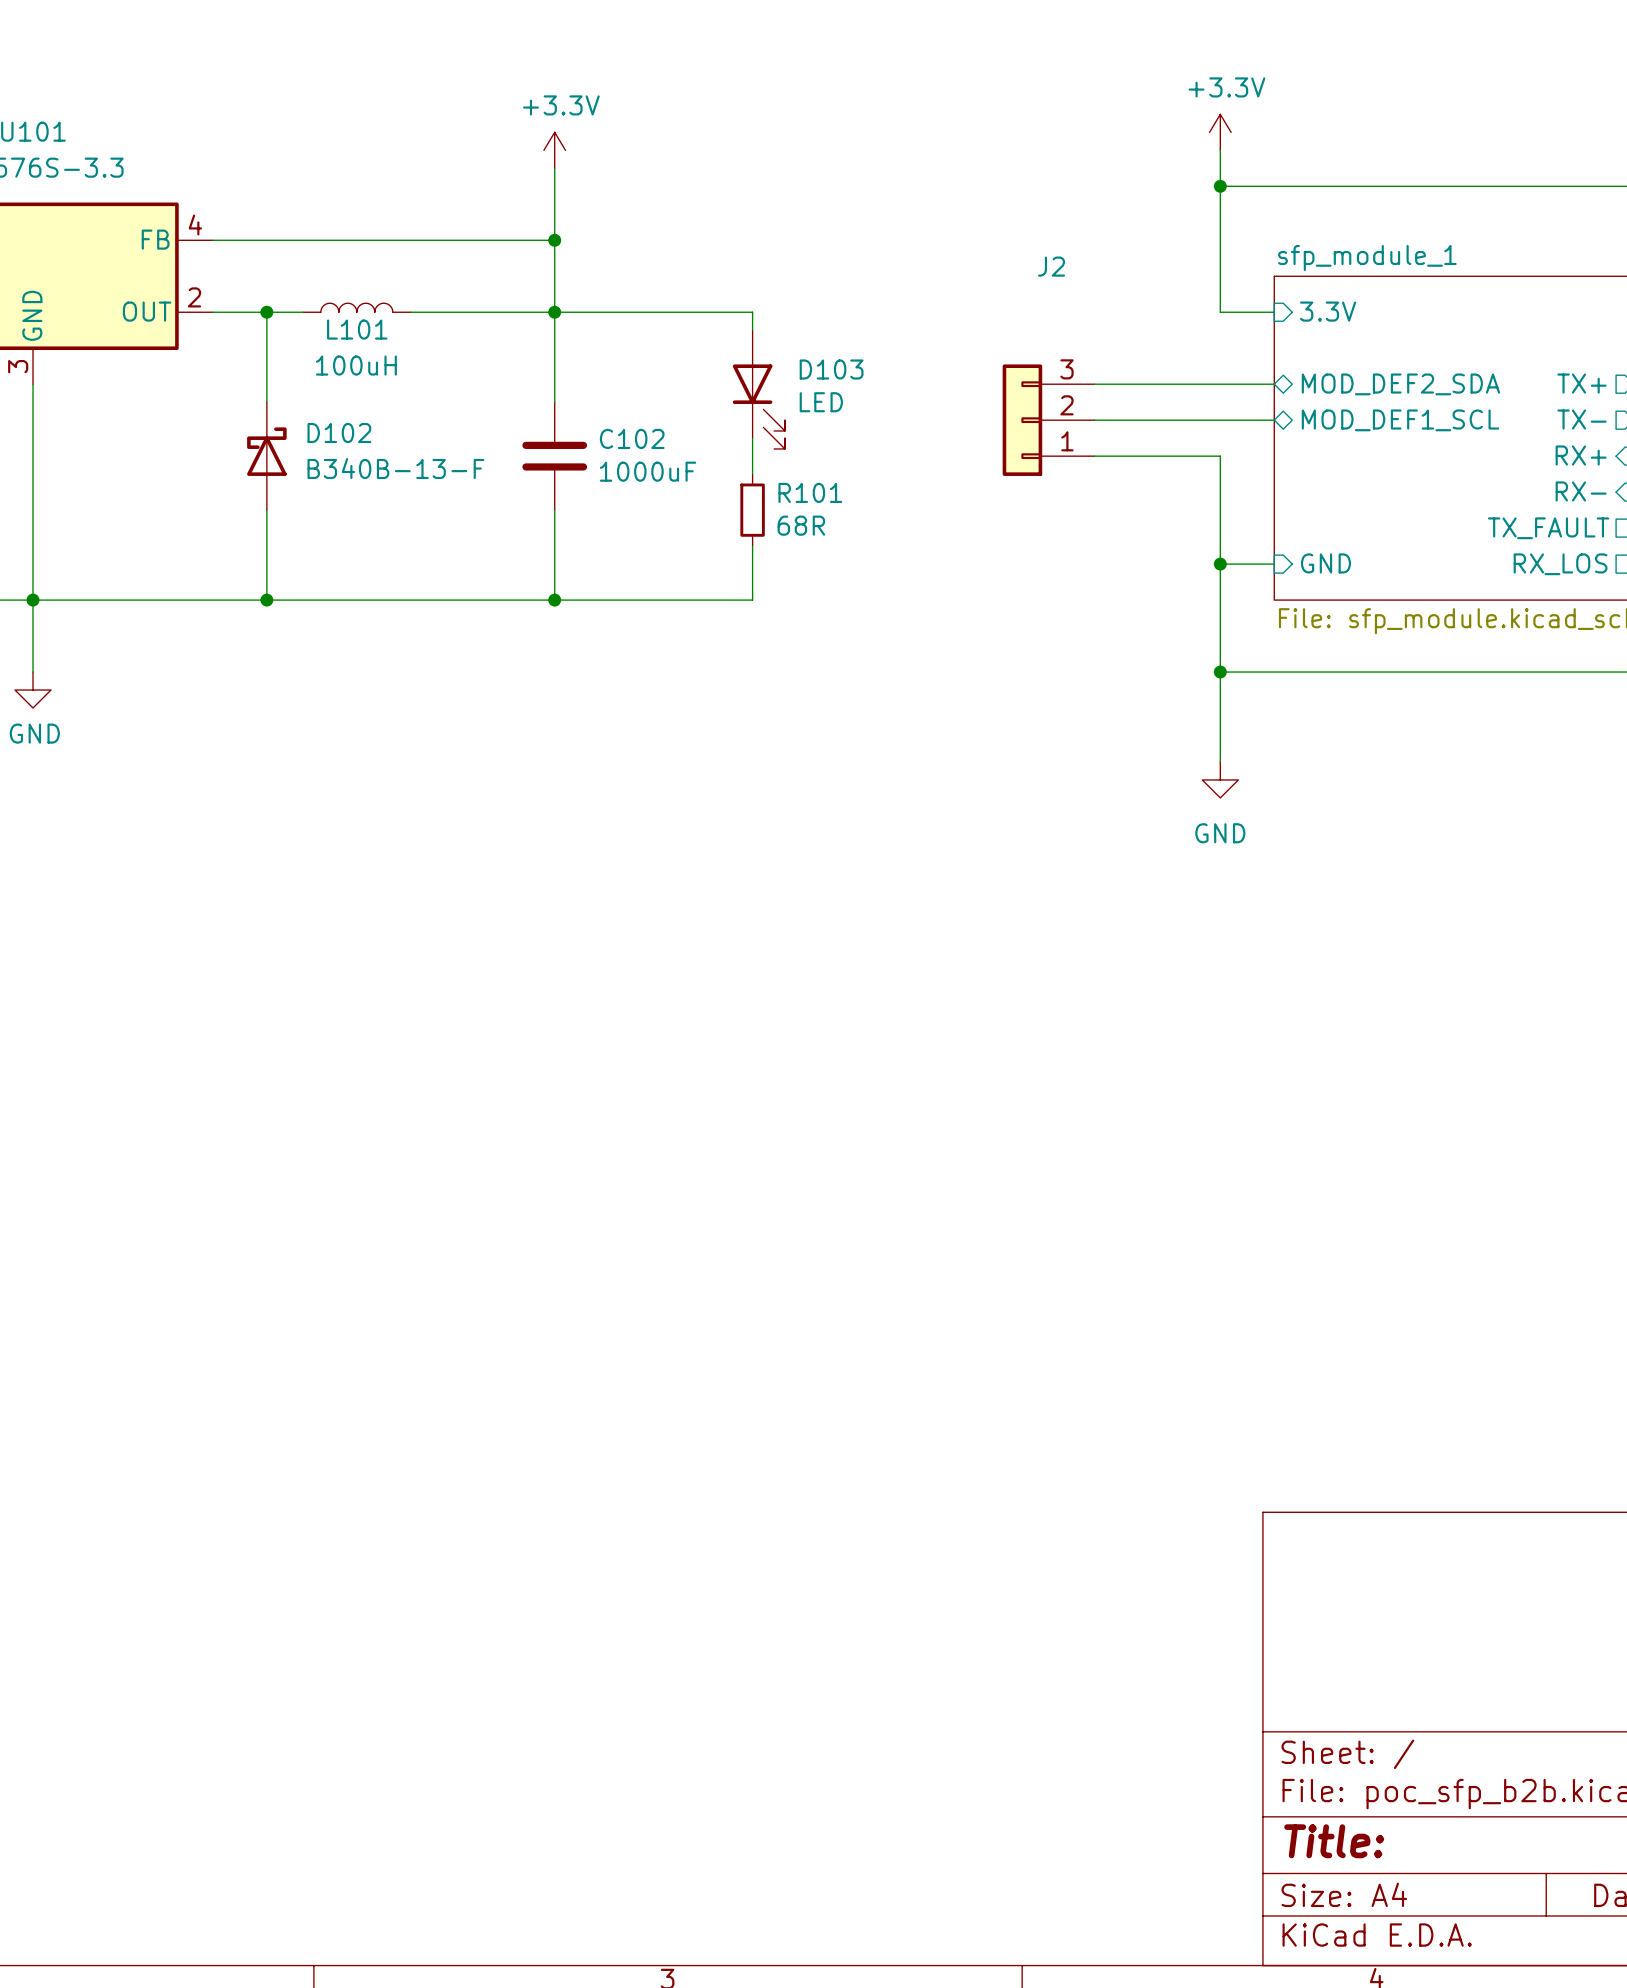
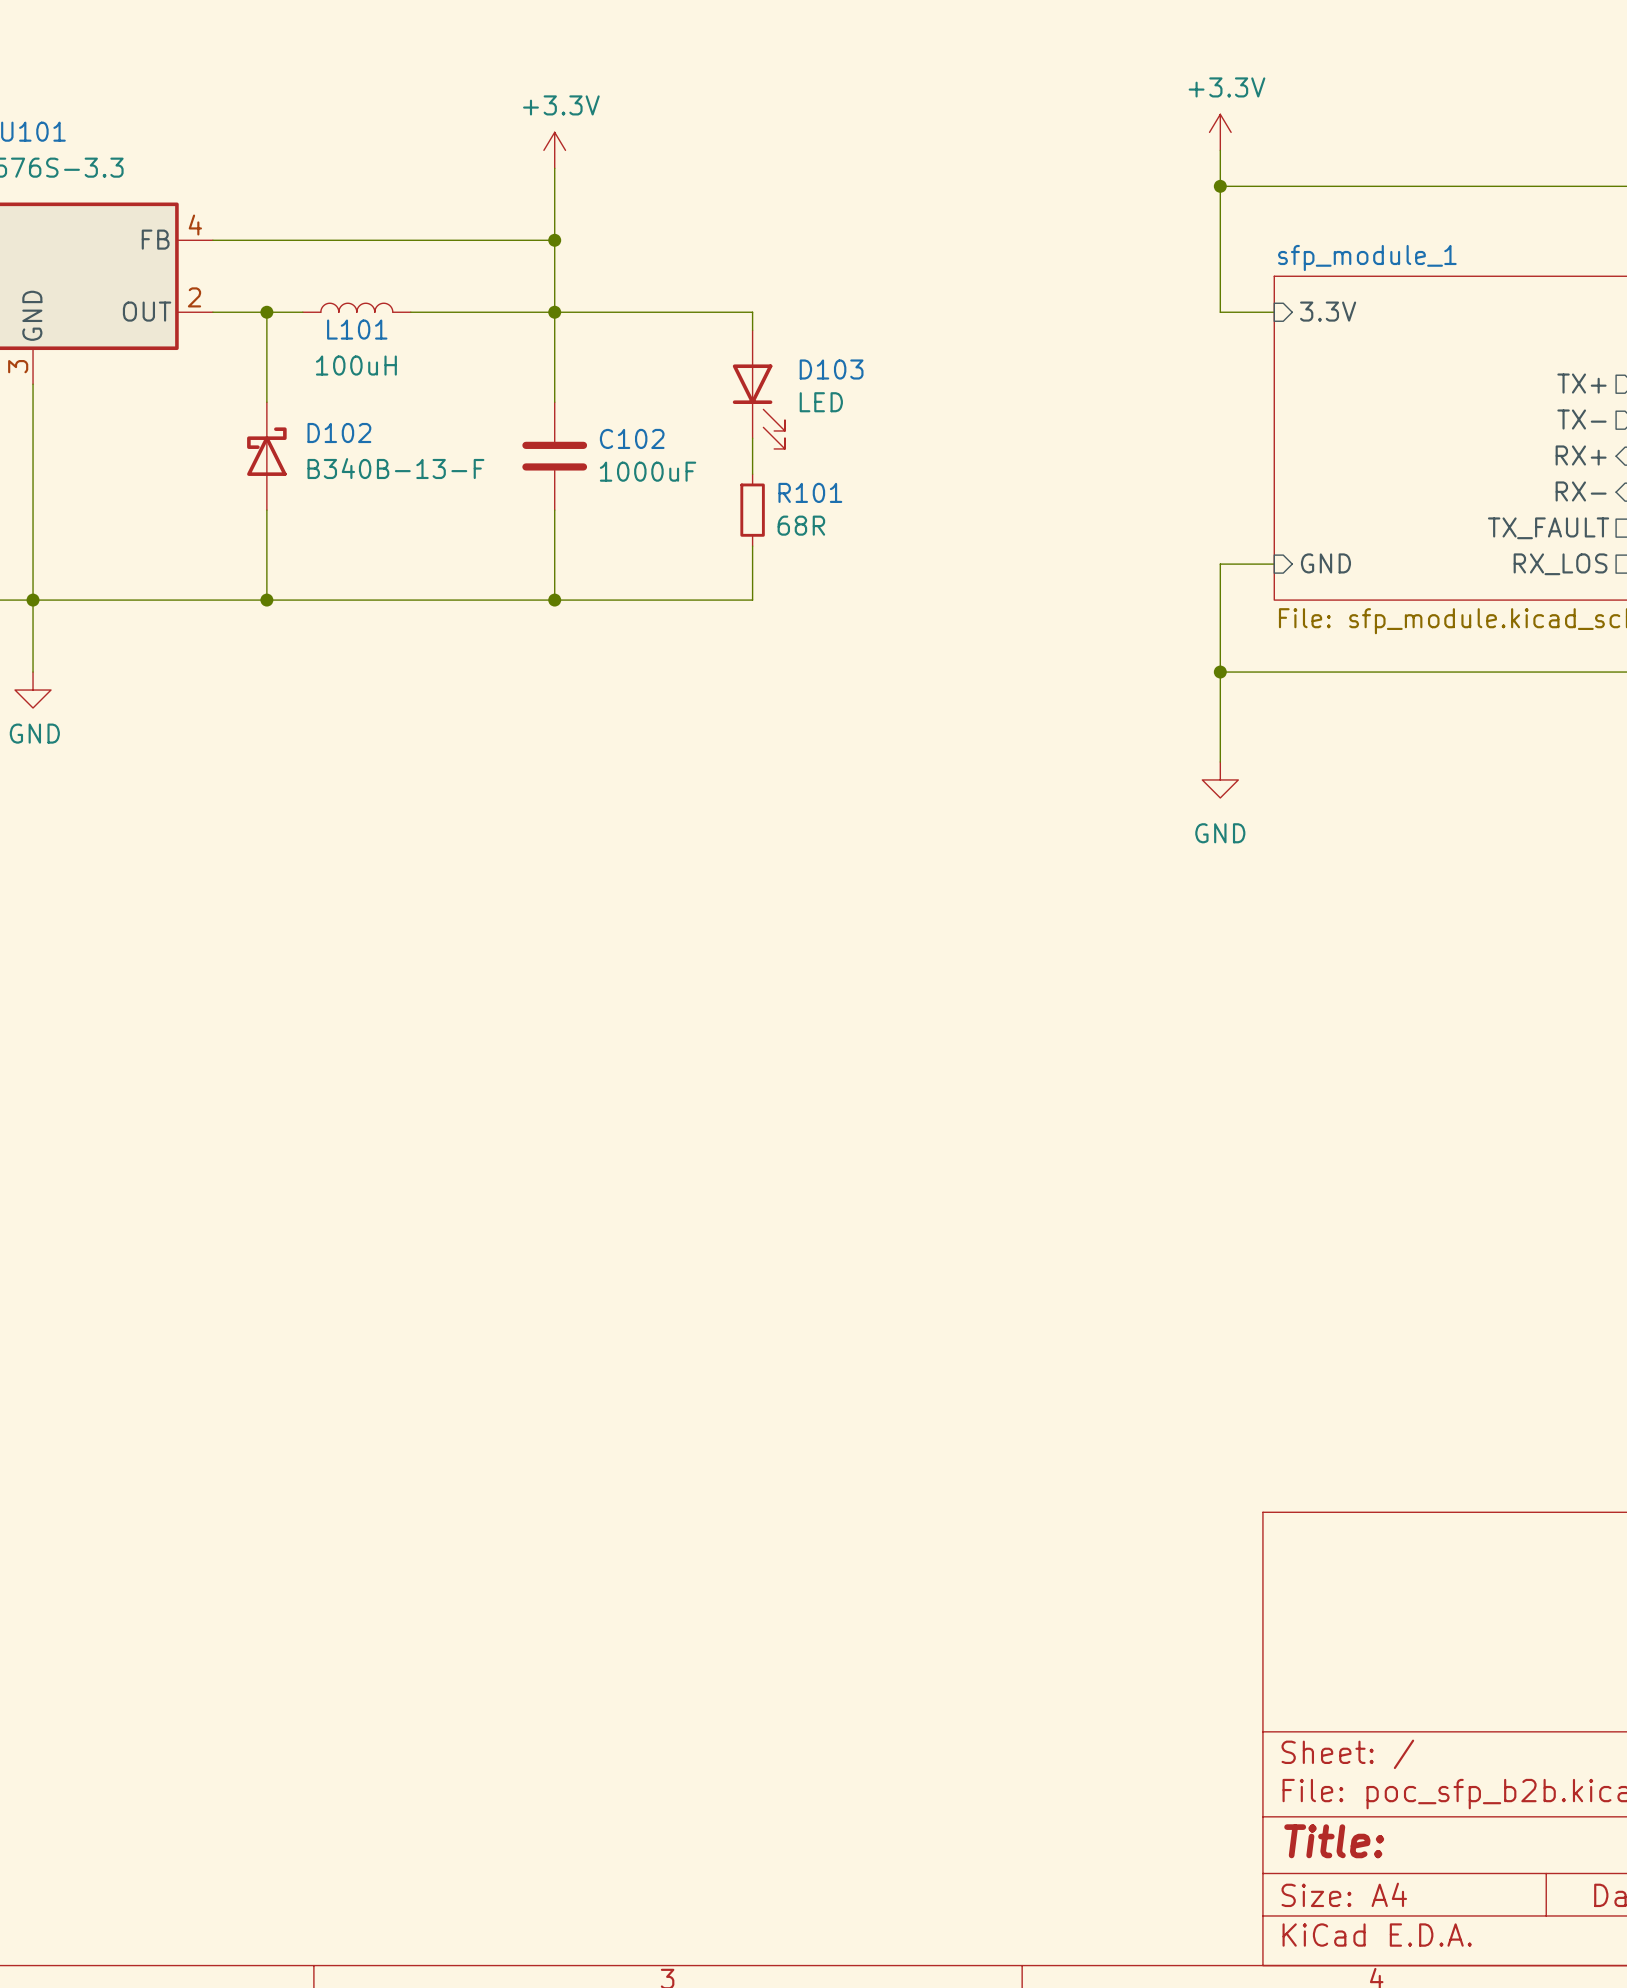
wire: (1094, 384) (1274, 384) -> none
sheet pin: MOD_DEF2_SDA (1400, 384) -> none
J2: (1048, 420) -> none
wire: (1094, 420) (1274, 420) -> none
sheet pin: MOD_DEF1_SCL (1400, 420) -> none
wire: (1094, 456) (1220, 456) (1220, 564) -> none
junction: (1220, 564) -> none

